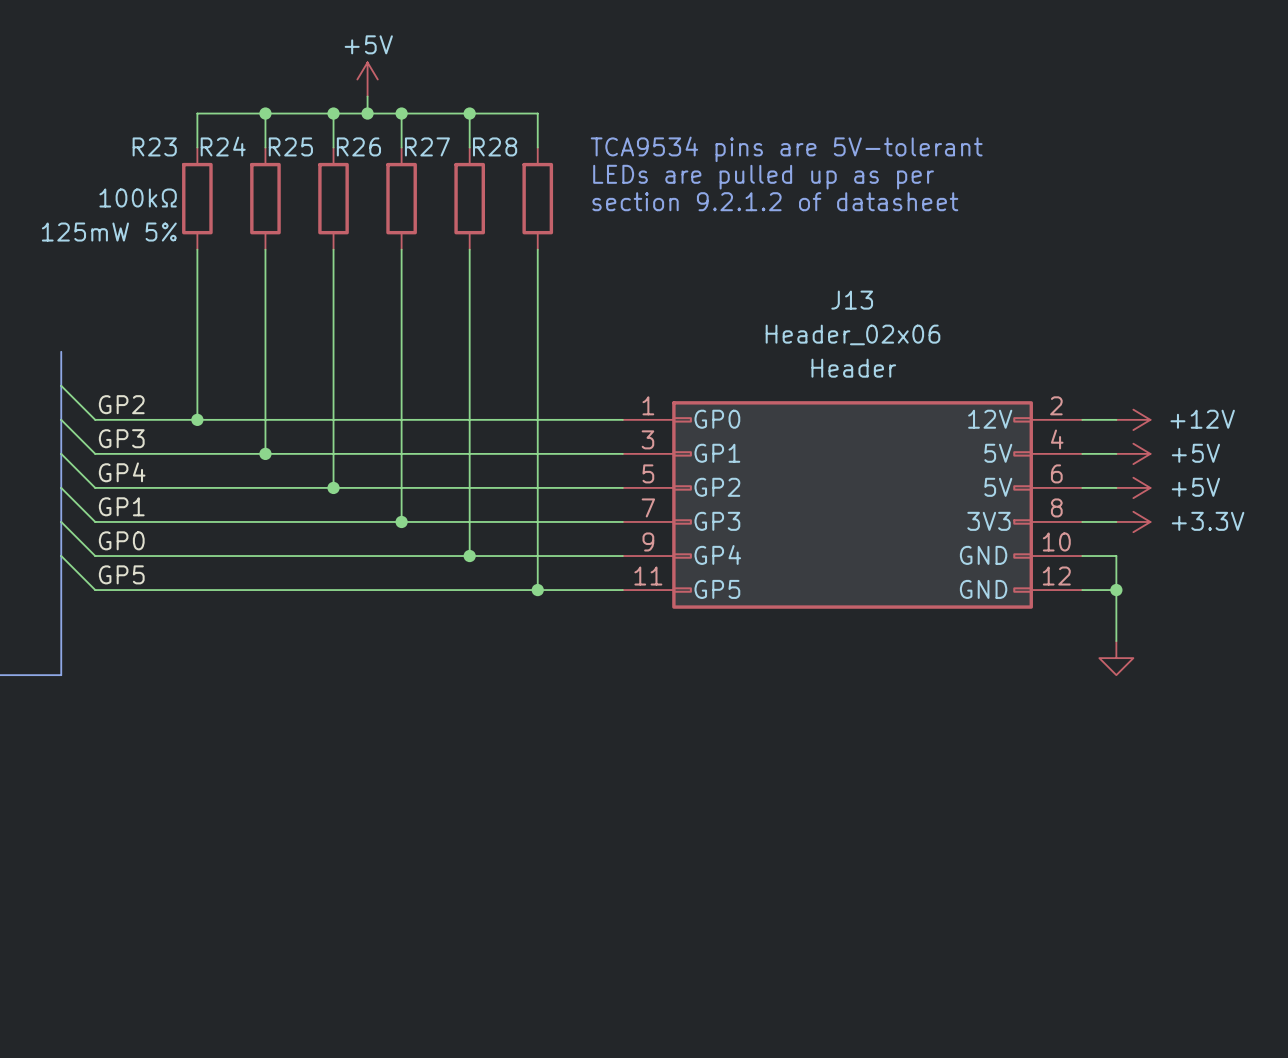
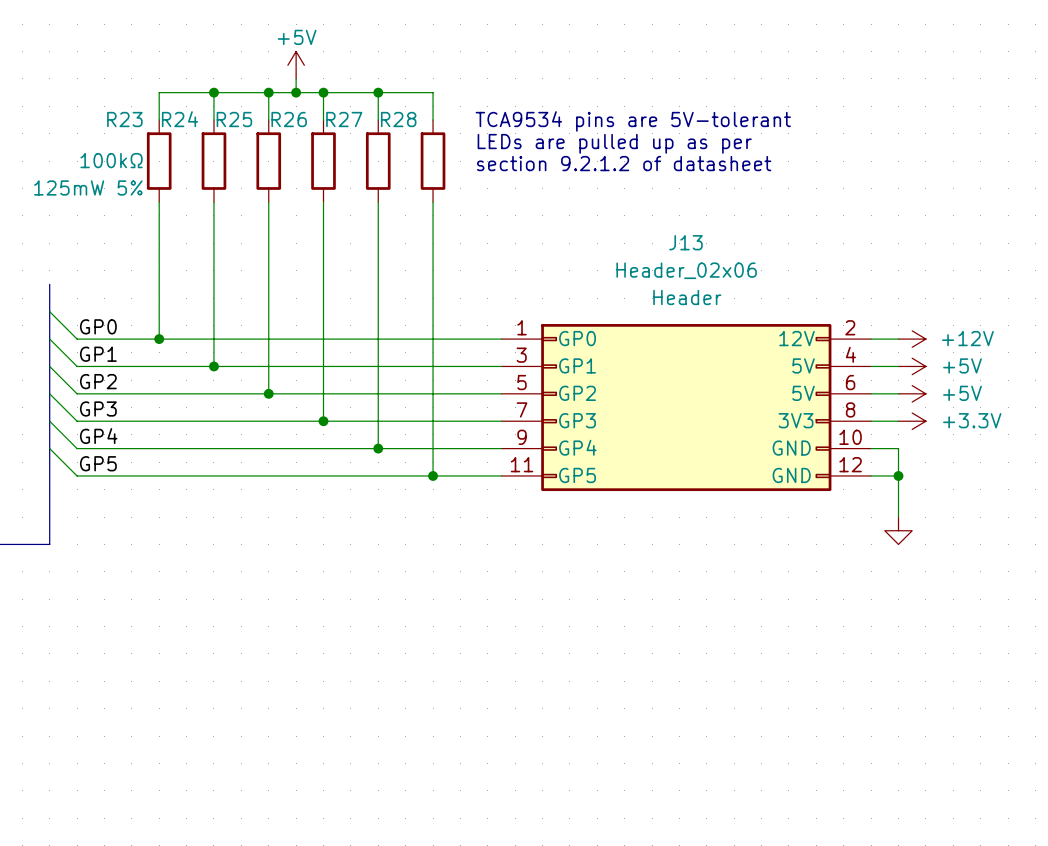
label: GP2 (121, 404) -> GP0 (98, 326)
label: GP3 (121, 438) -> GP1 (98, 354)
label: GP4 (122, 472) -> GP2 (98, 381)
label: GP1 (121, 506) -> GP3 (98, 409)
label: GP0 (121, 540) -> GP4 (98, 436)

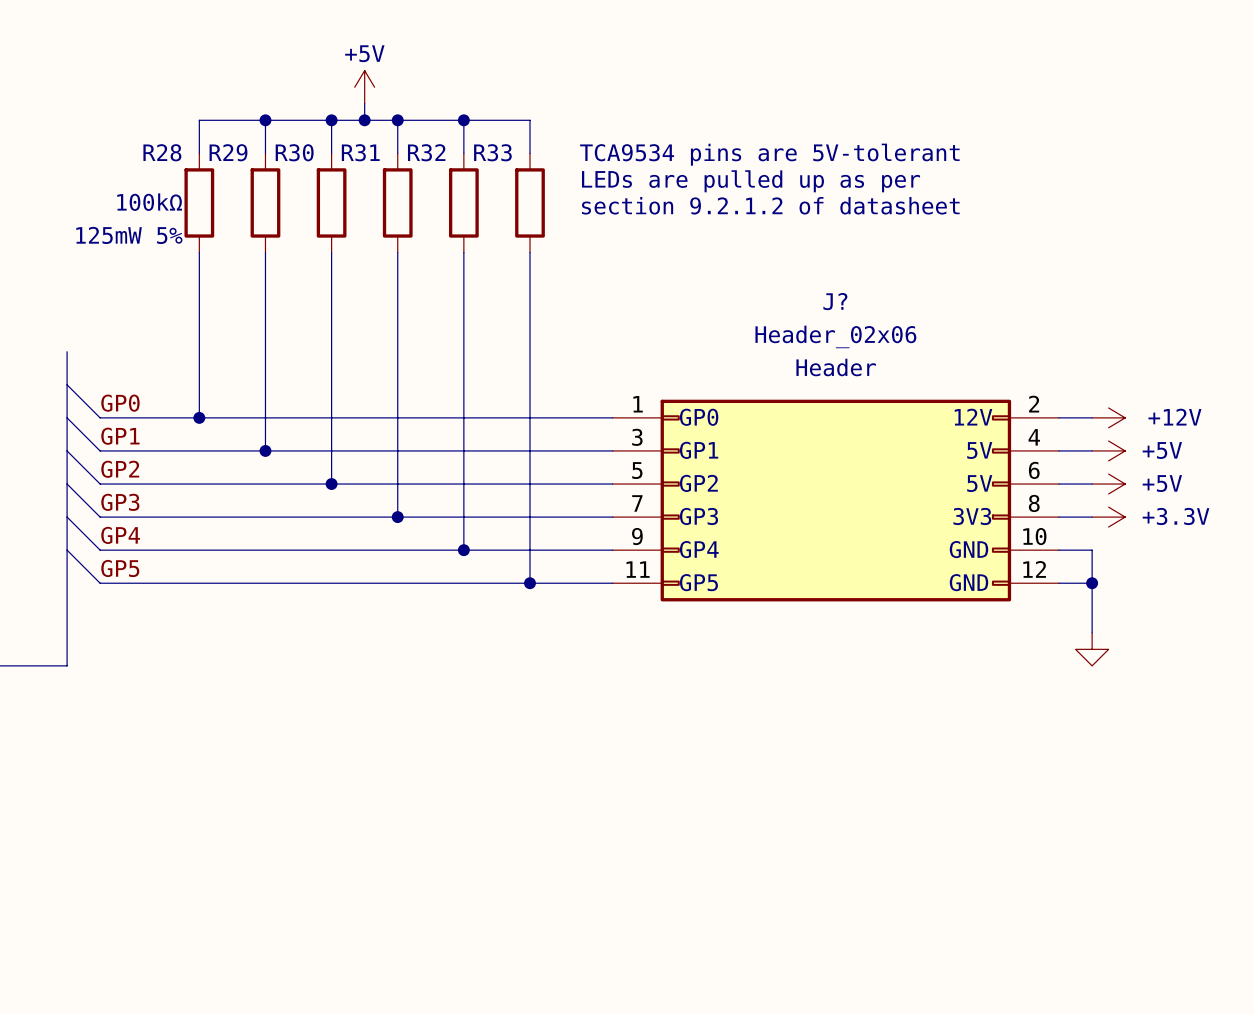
R23 name: R23 (124, 119) -> R28 (162, 152)
R24 name: R24 (179, 119) -> R29 (228, 152)
R25 name: R25 (234, 119) -> R30 (294, 152)
R26 name: R26 (289, 119) -> R31 (360, 152)
R27 name: R27 (344, 119) -> R32 (426, 152)
R28 name: R28 (398, 119) -> R33 (492, 152)
J13 name: J13 (685, 242) -> J? (835, 301)

